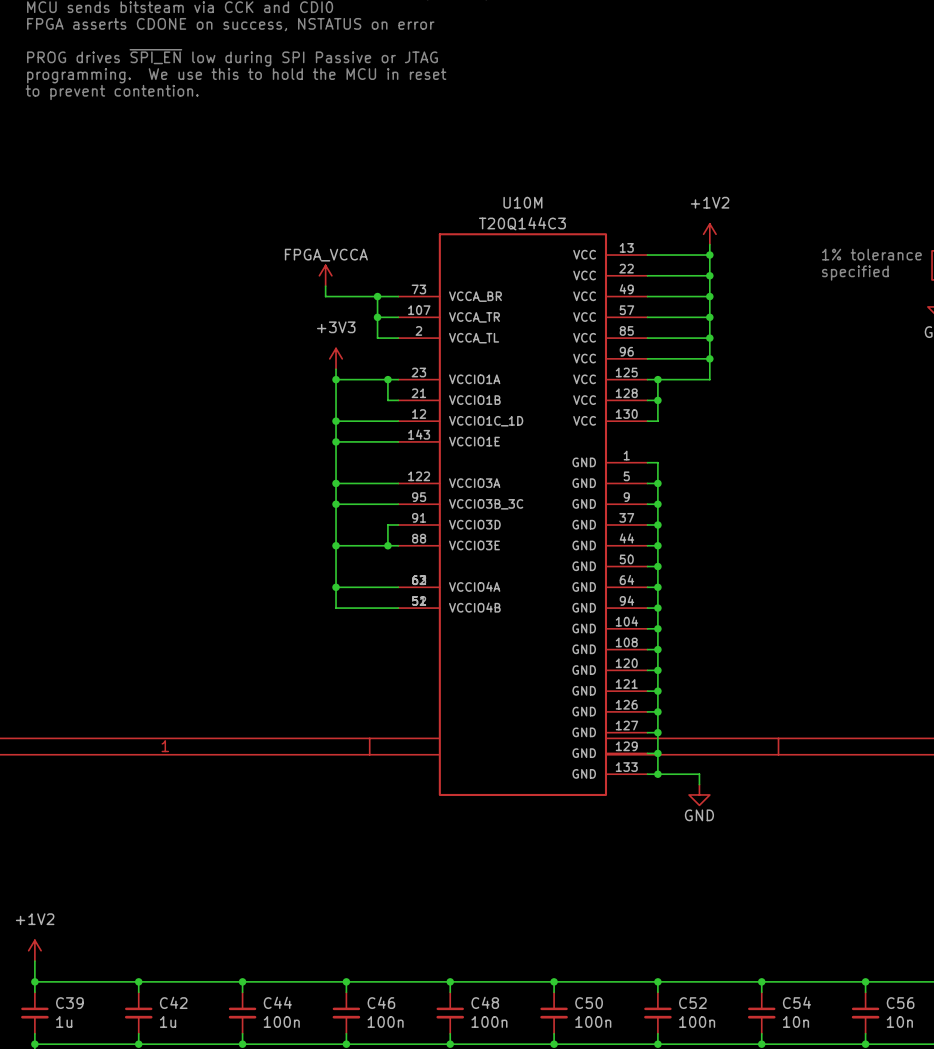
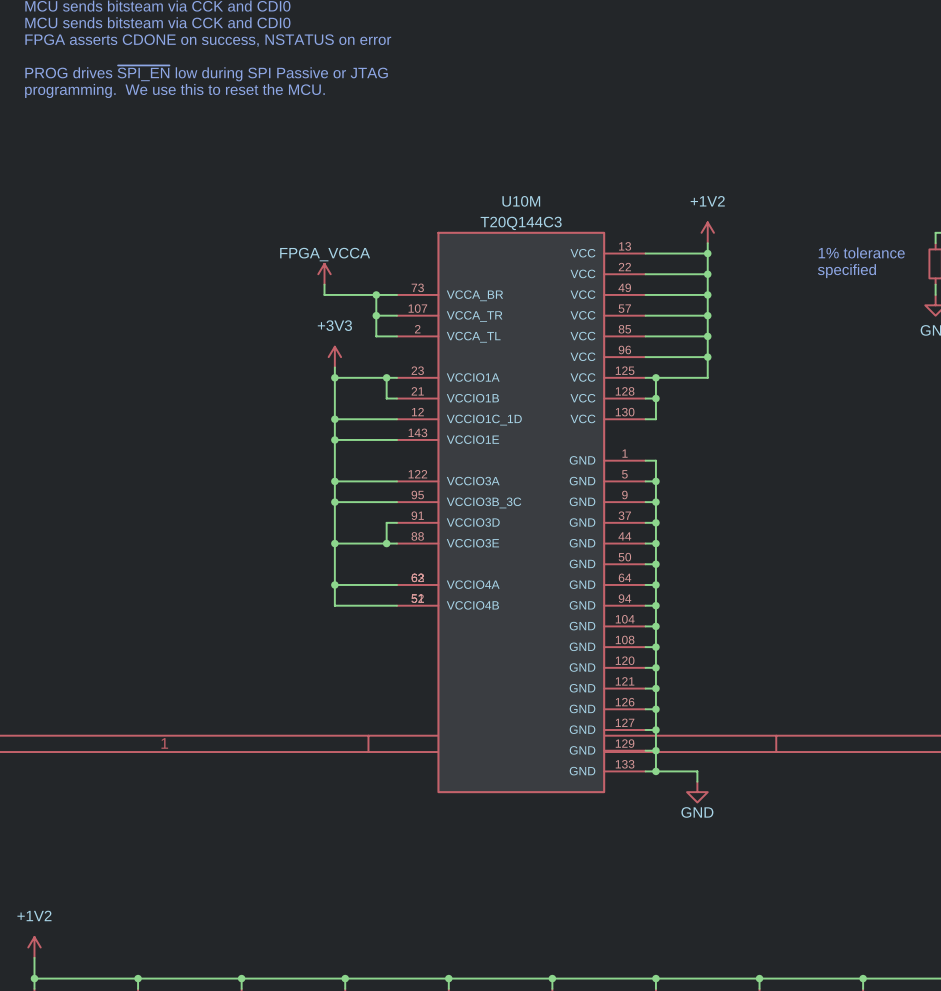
text: FPGA asserts CDONE on success, NSTATUS on error (230, 24) -> MCU sends bitsteam via CCK and CDI0 (157, 22)
text: none -> FPGA asserts CDONE on success, NSTATUS on error (208, 40)
text: PROG drives ~{SPI_EN} low during SPI Passive or JTAG (232, 57) -> none
text: programming. We use this to hold the MCU in reset (236, 75) -> PROG drives ~{SPI_EN} low during SPI Passive or JTAG (206, 73)
text: to prevent contention. (112, 92) -> programming. We use this to reset the MCU. (174, 90)

